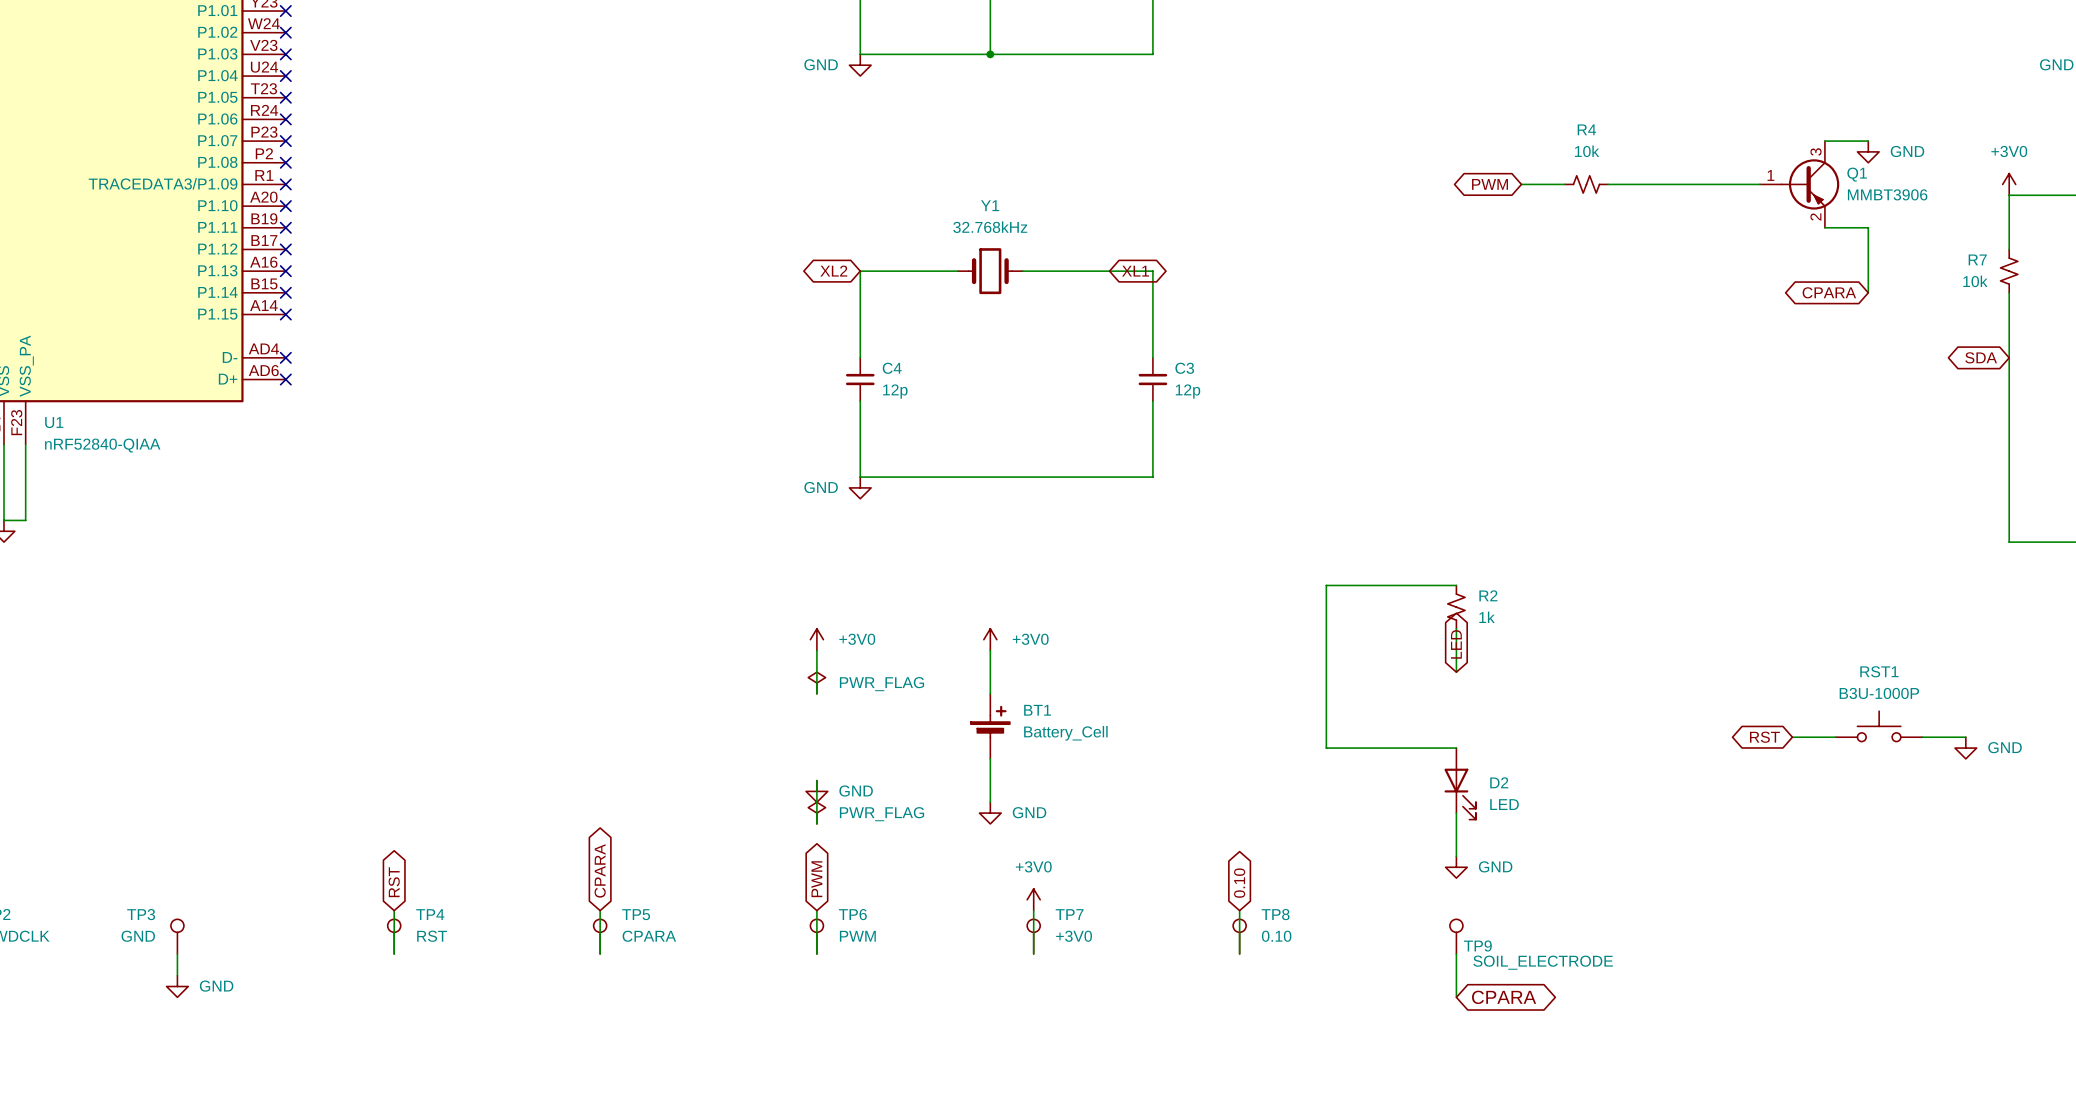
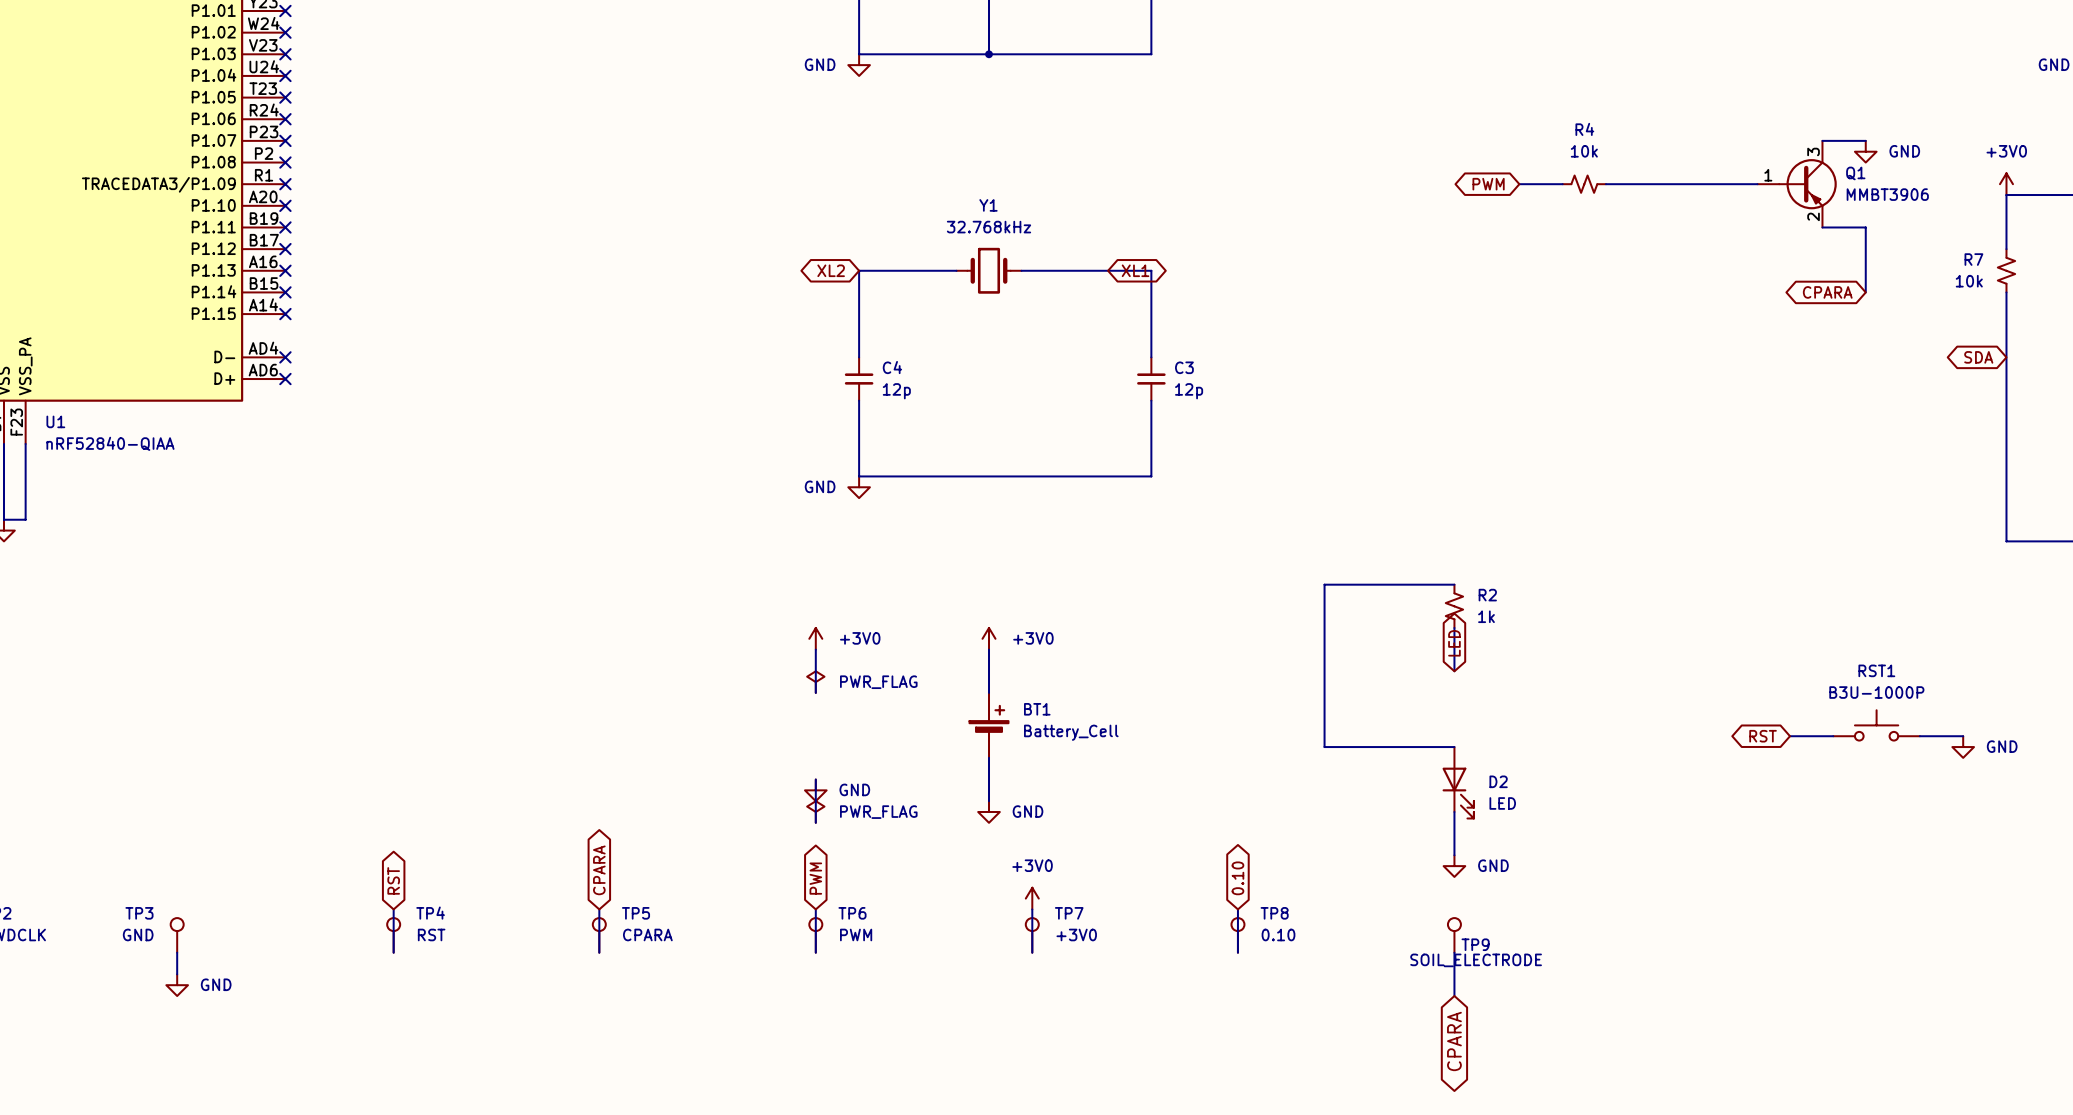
TP9 value position: SOIL_ELECTRODE (1543, 962) -> SOIL_ELECTRODE (1476, 960)
global label rotation: 0° (1504, 997) -> 90° clockwise (1454, 1041)

